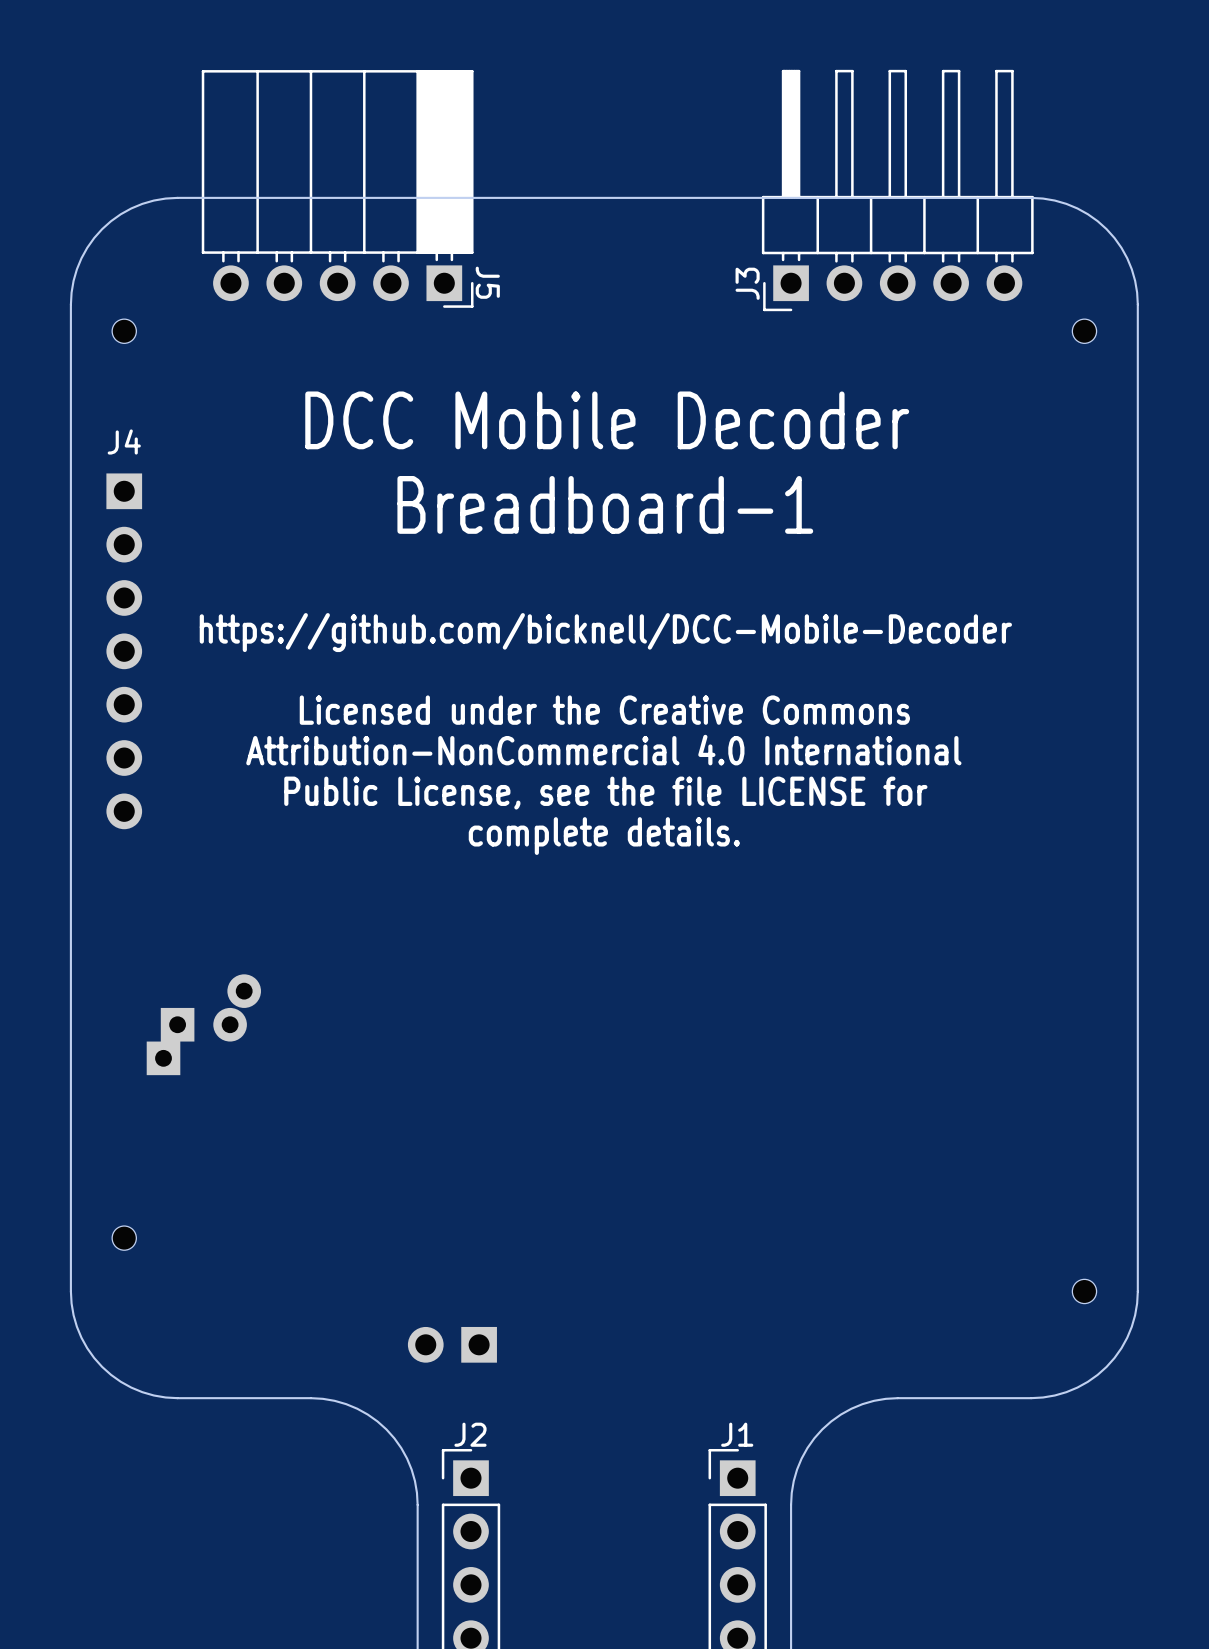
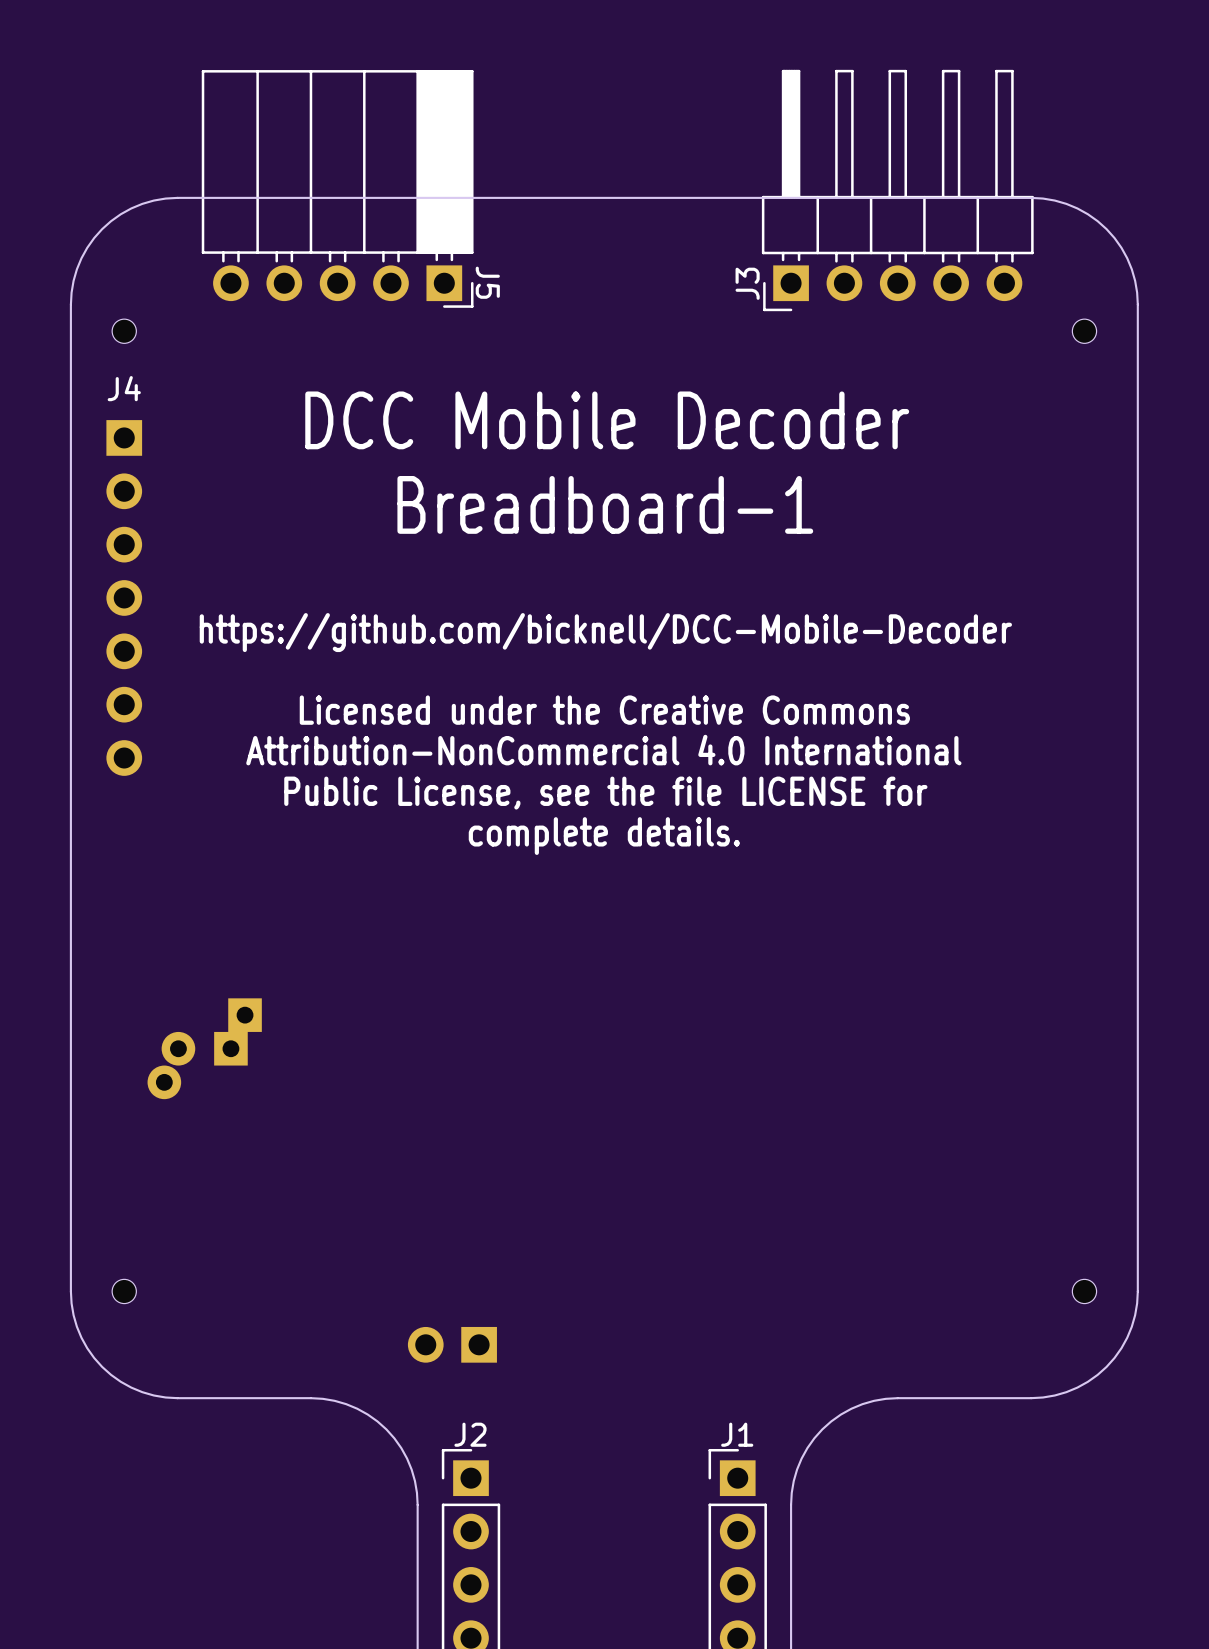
J4 position: (124, 651) -> (124, 597)
part rotation: 0° (203, 1024) -> 180° (204, 1048)
part position: (124, 1238) -> (124, 1291)

